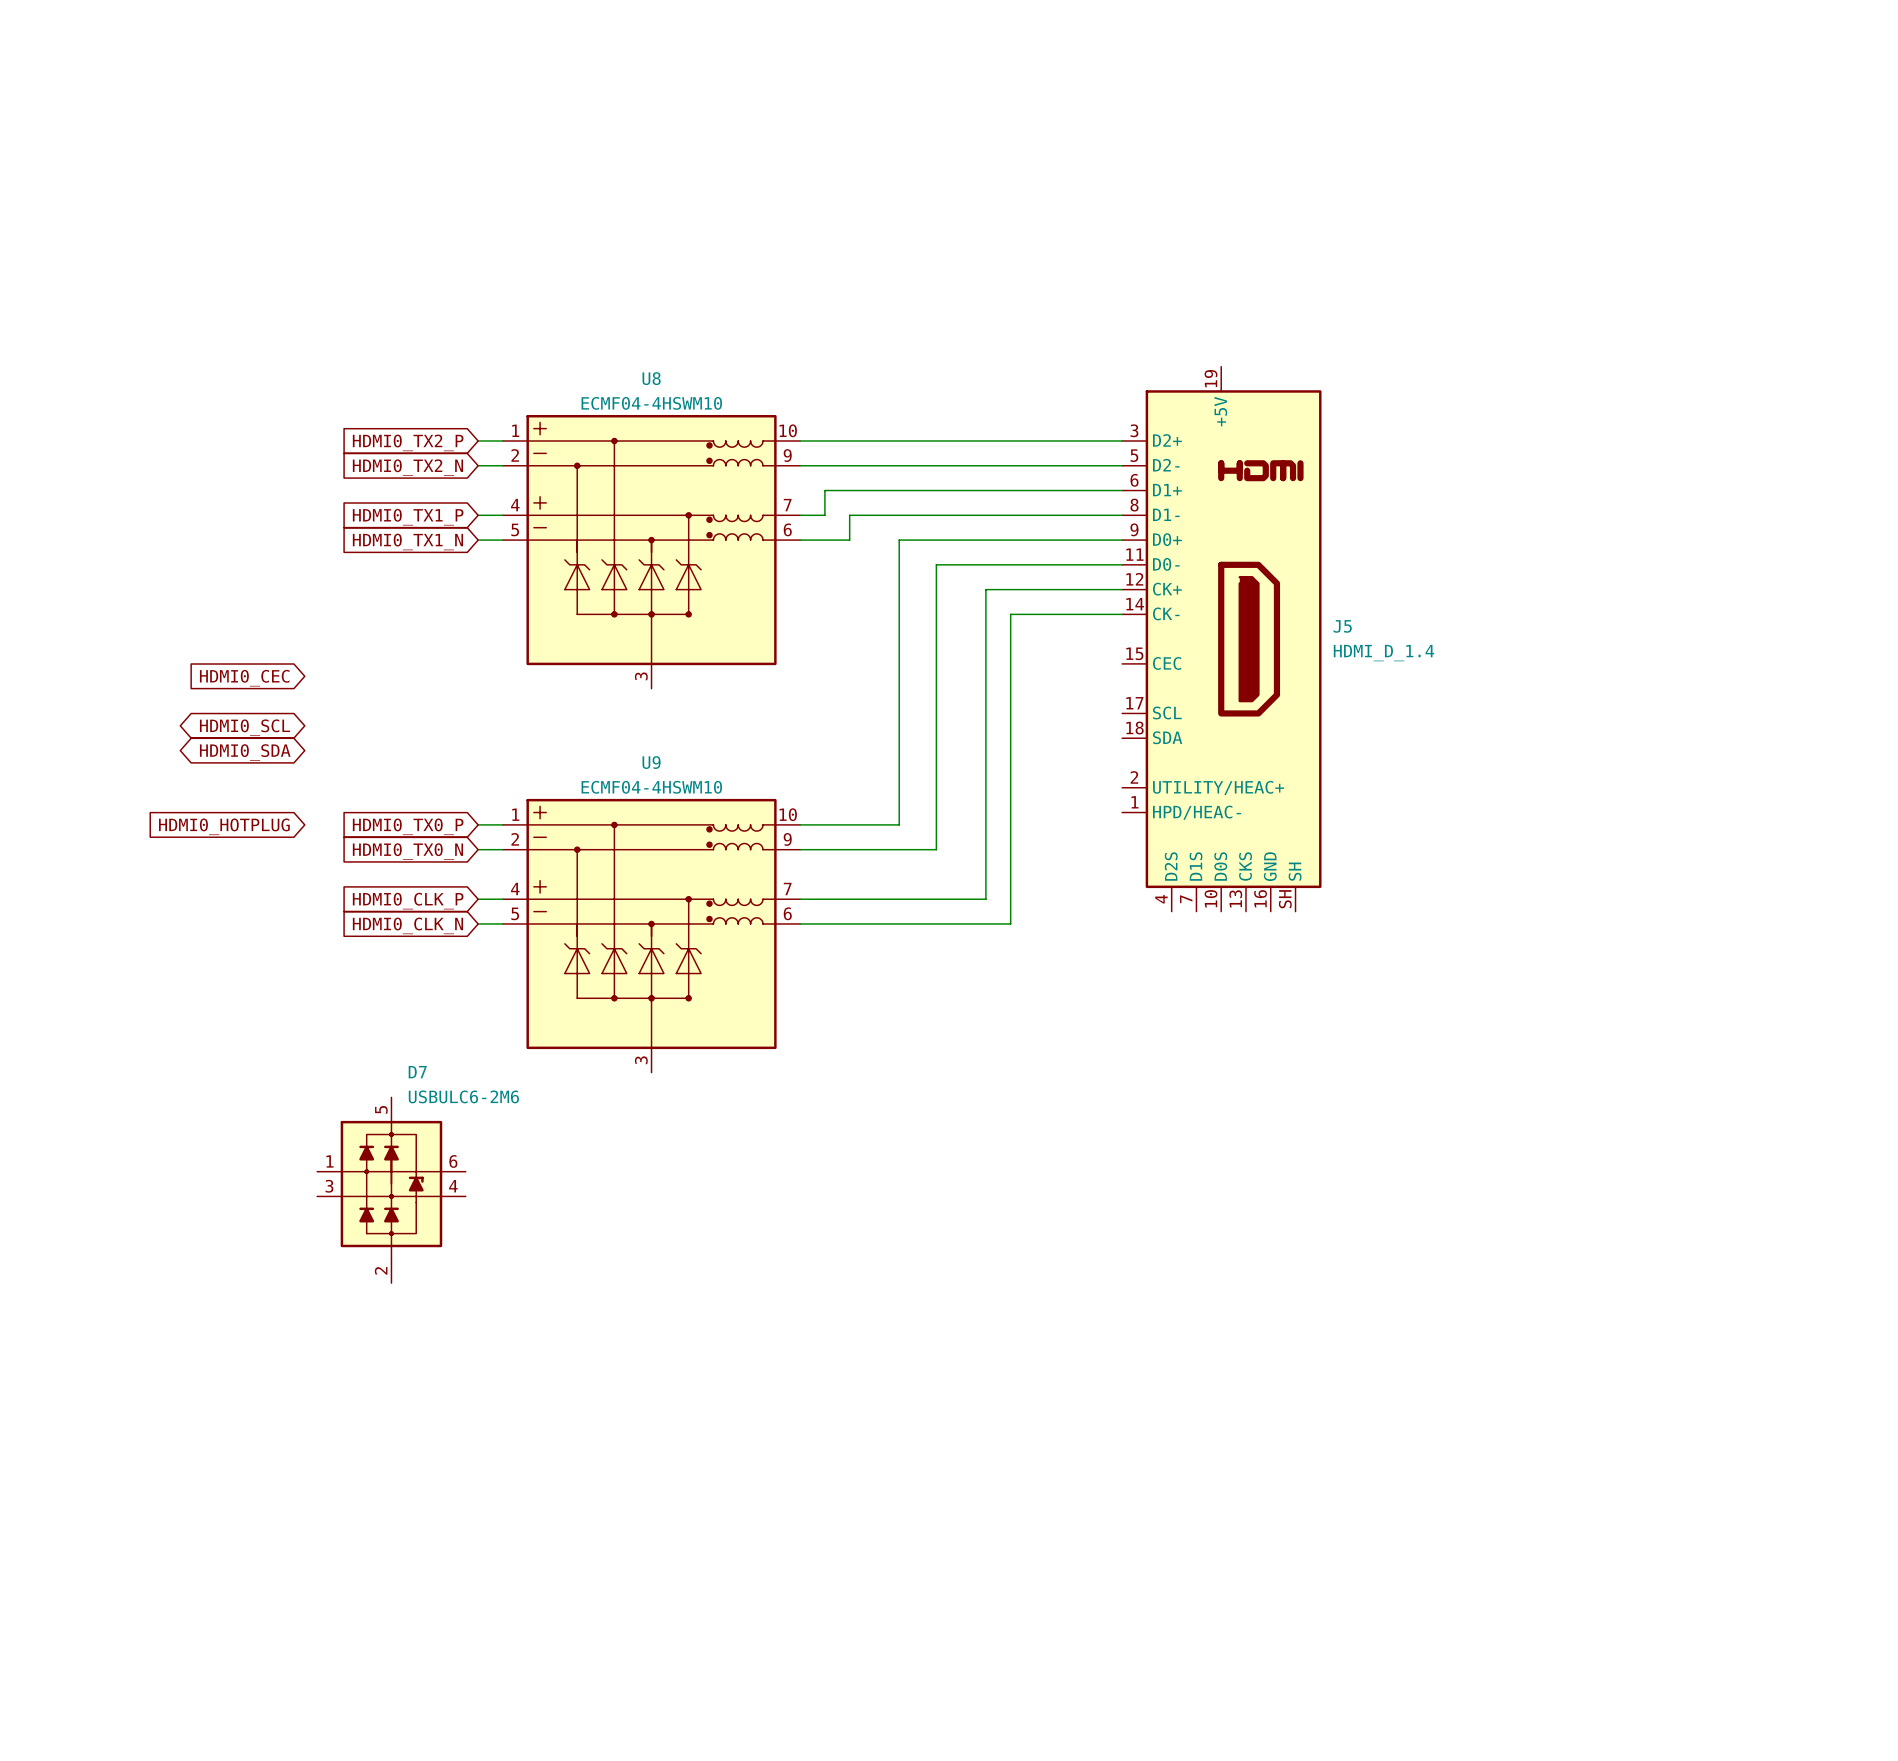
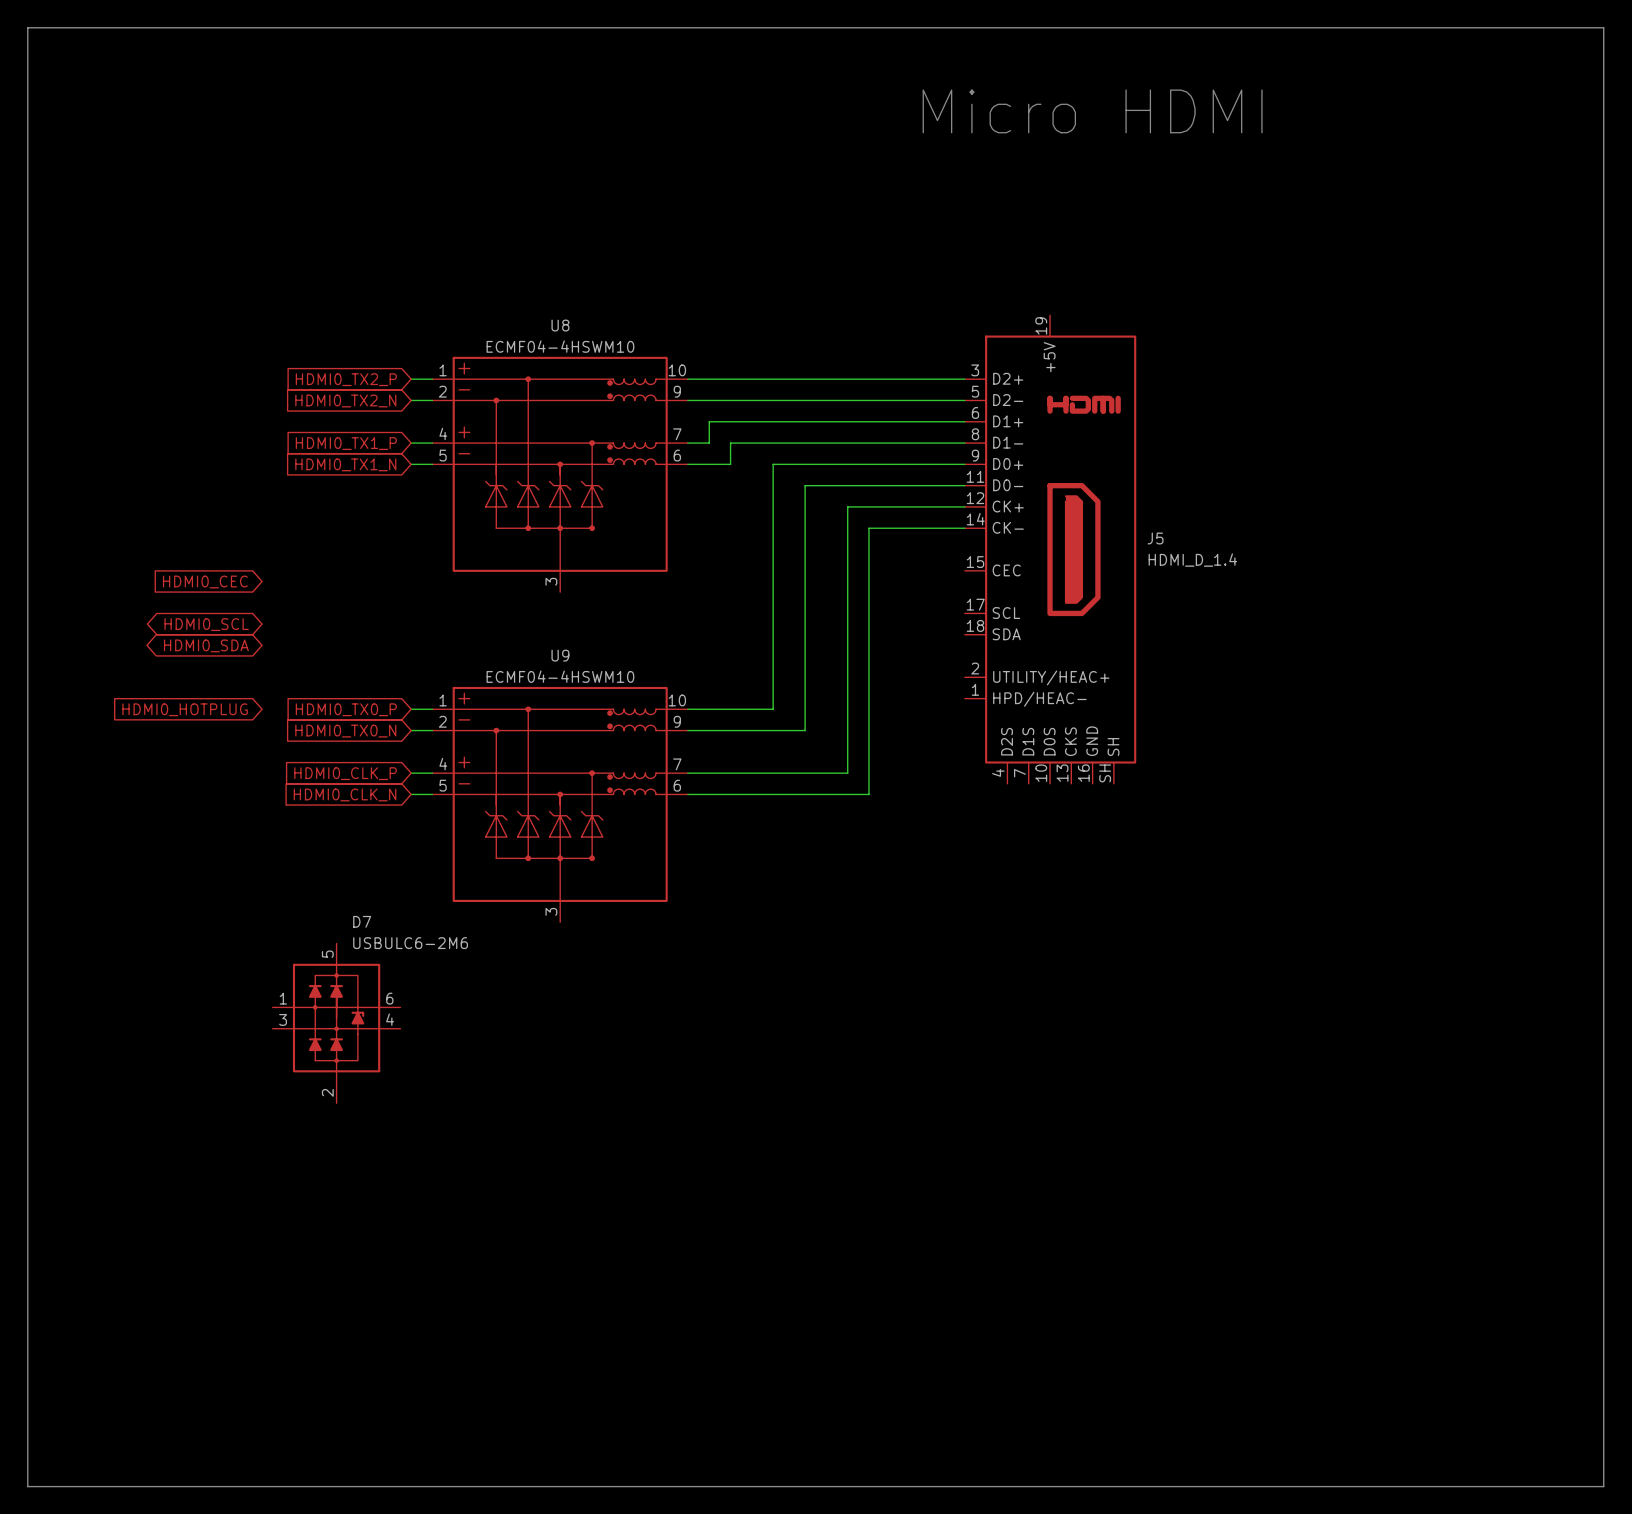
line: none -> (27, 27) (1603, 27) (1603, 1486) (27, 1486) (27, 27)
text: none -> Micro HDMI (1092, 111)

